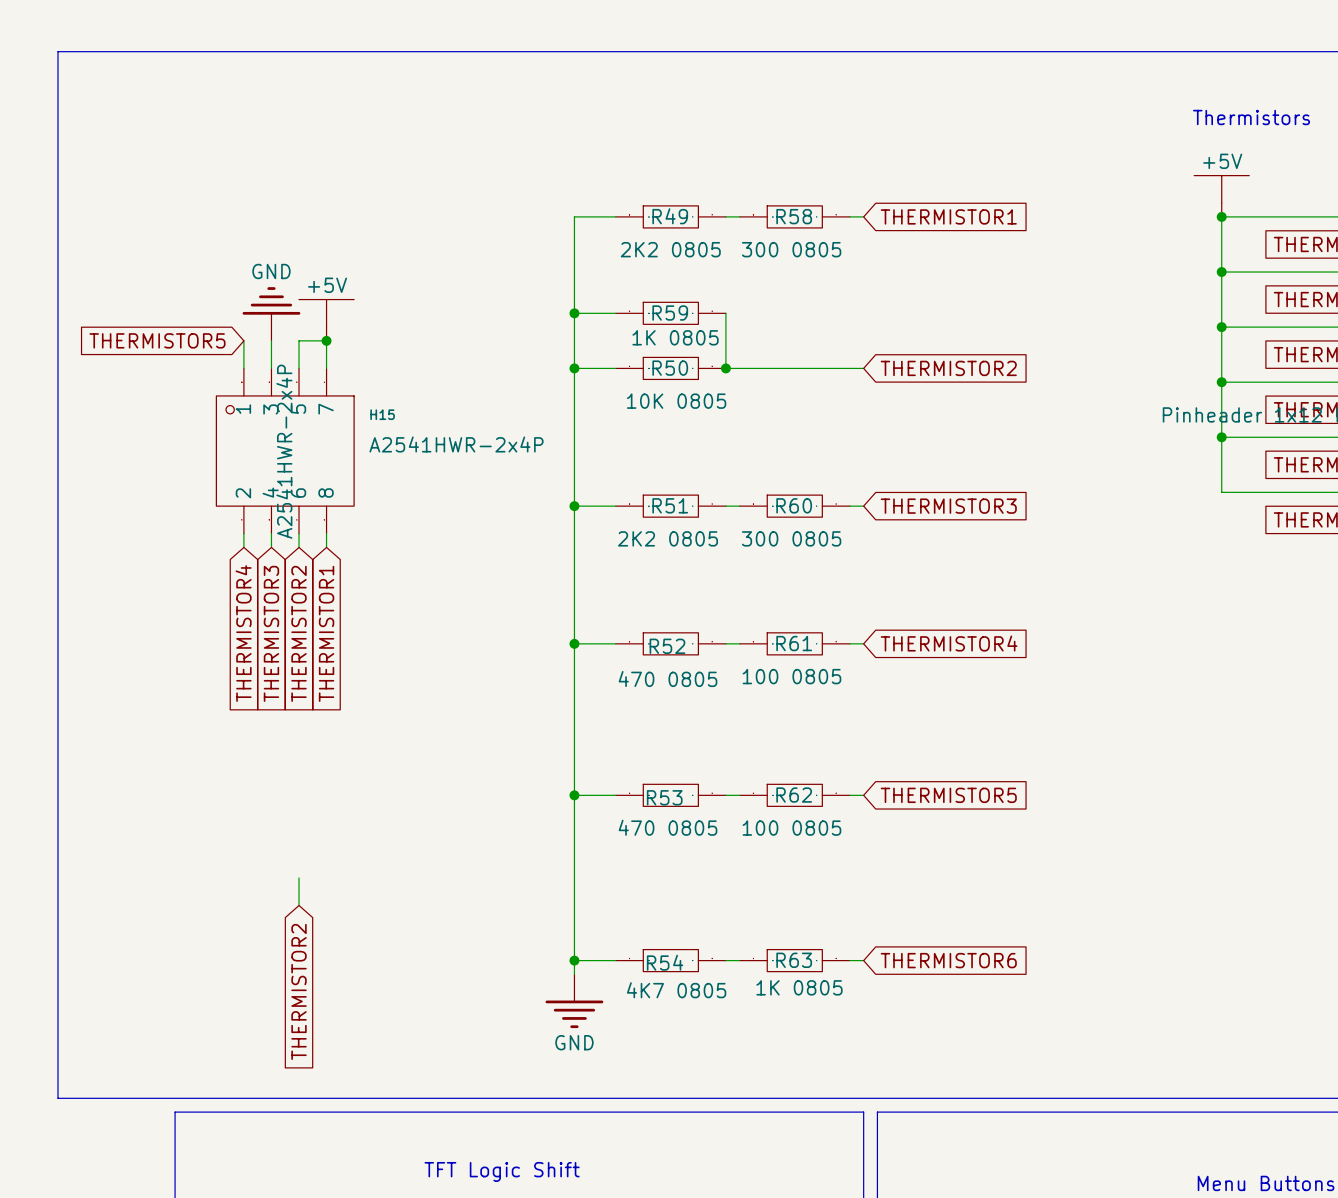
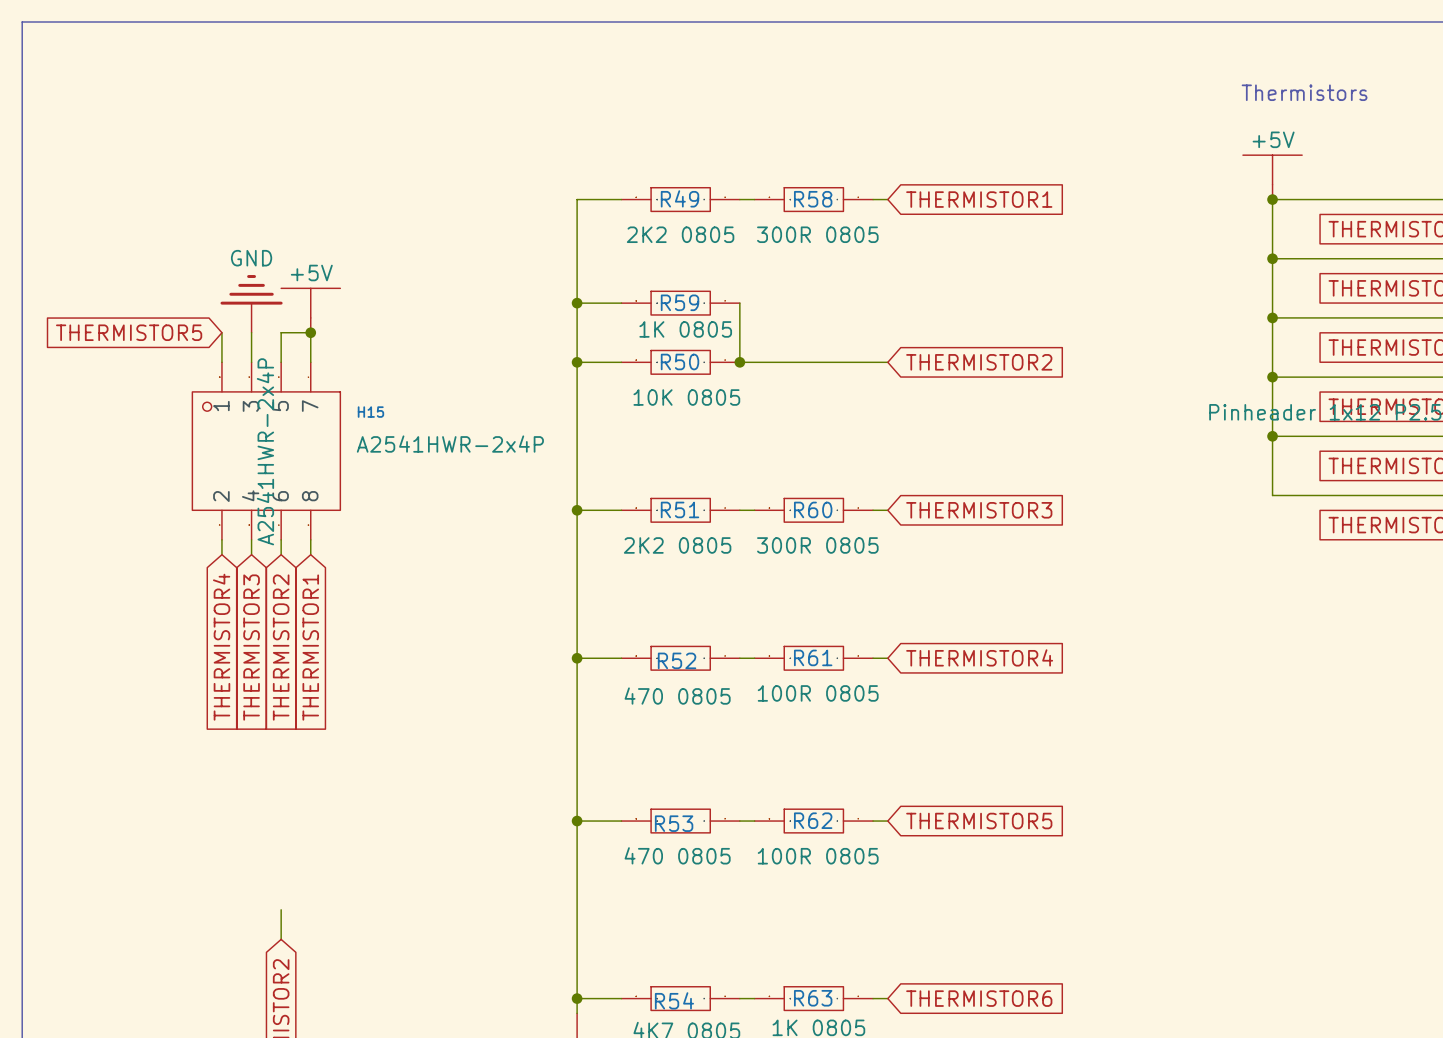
R58 value: 300 0805 (791, 249) -> 300R 0805 (817, 234)
R60 value: 300 0805 (791, 538) -> 300R 0805 (817, 545)
R61 value: 100 0805 (791, 676) -> 100R 0805 (818, 693)
R62 value: 100 0805 (791, 828) -> 100R 0805 (818, 856)

